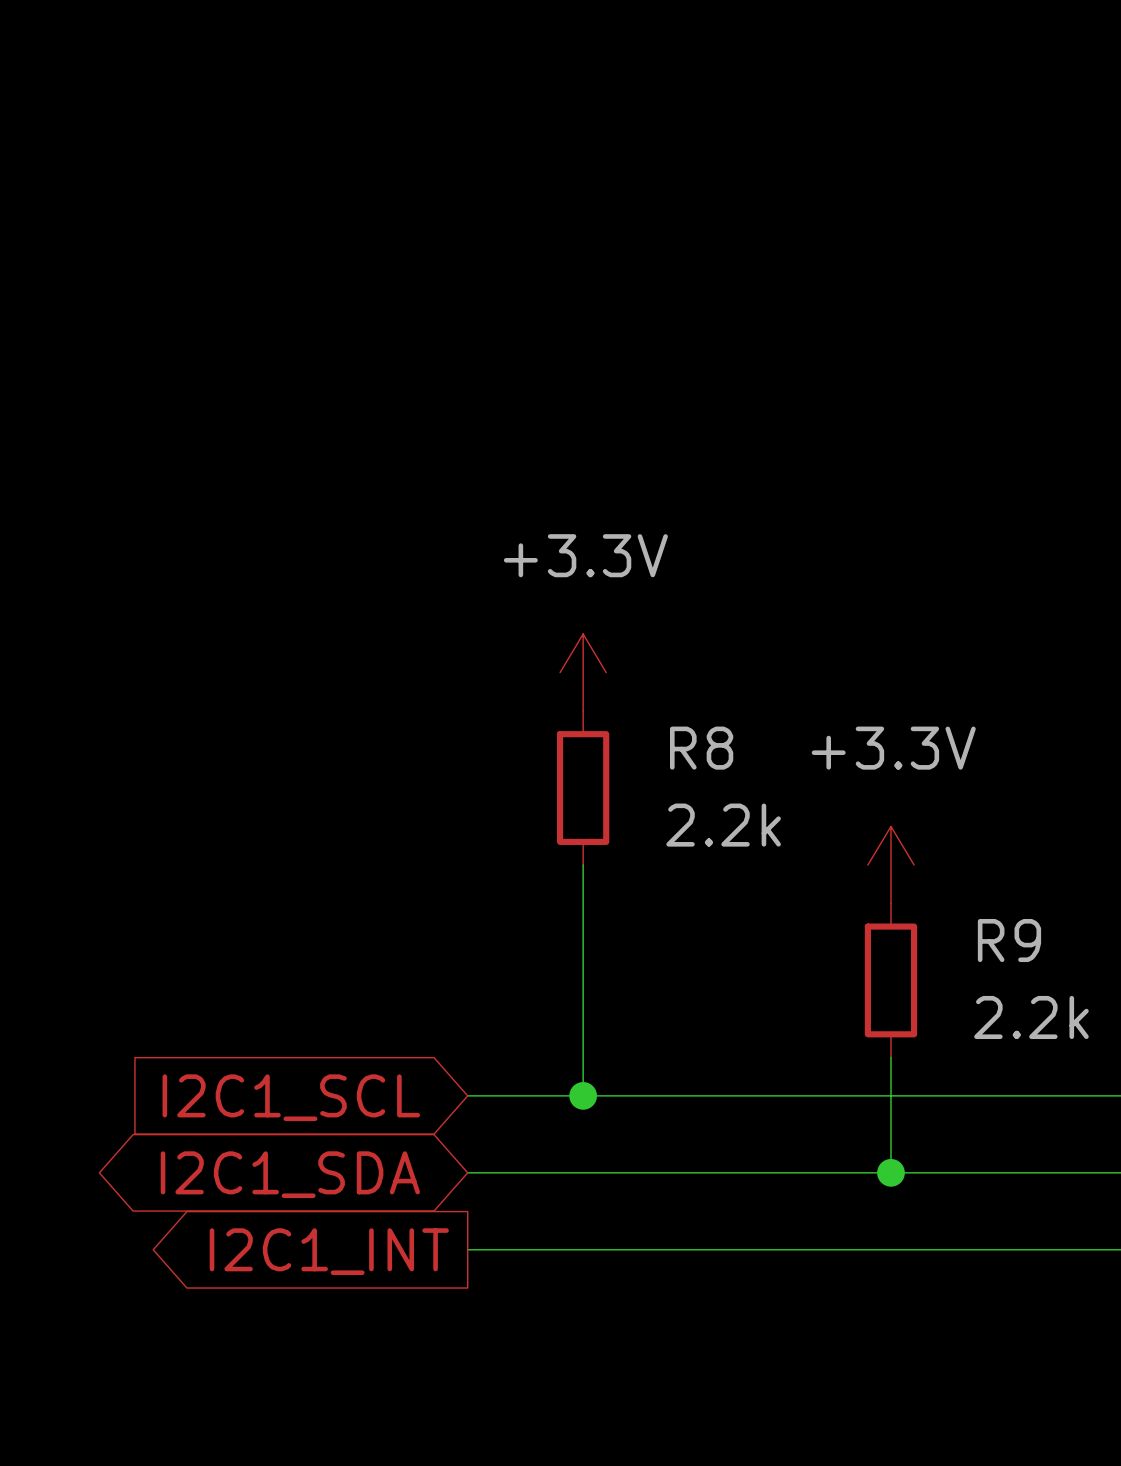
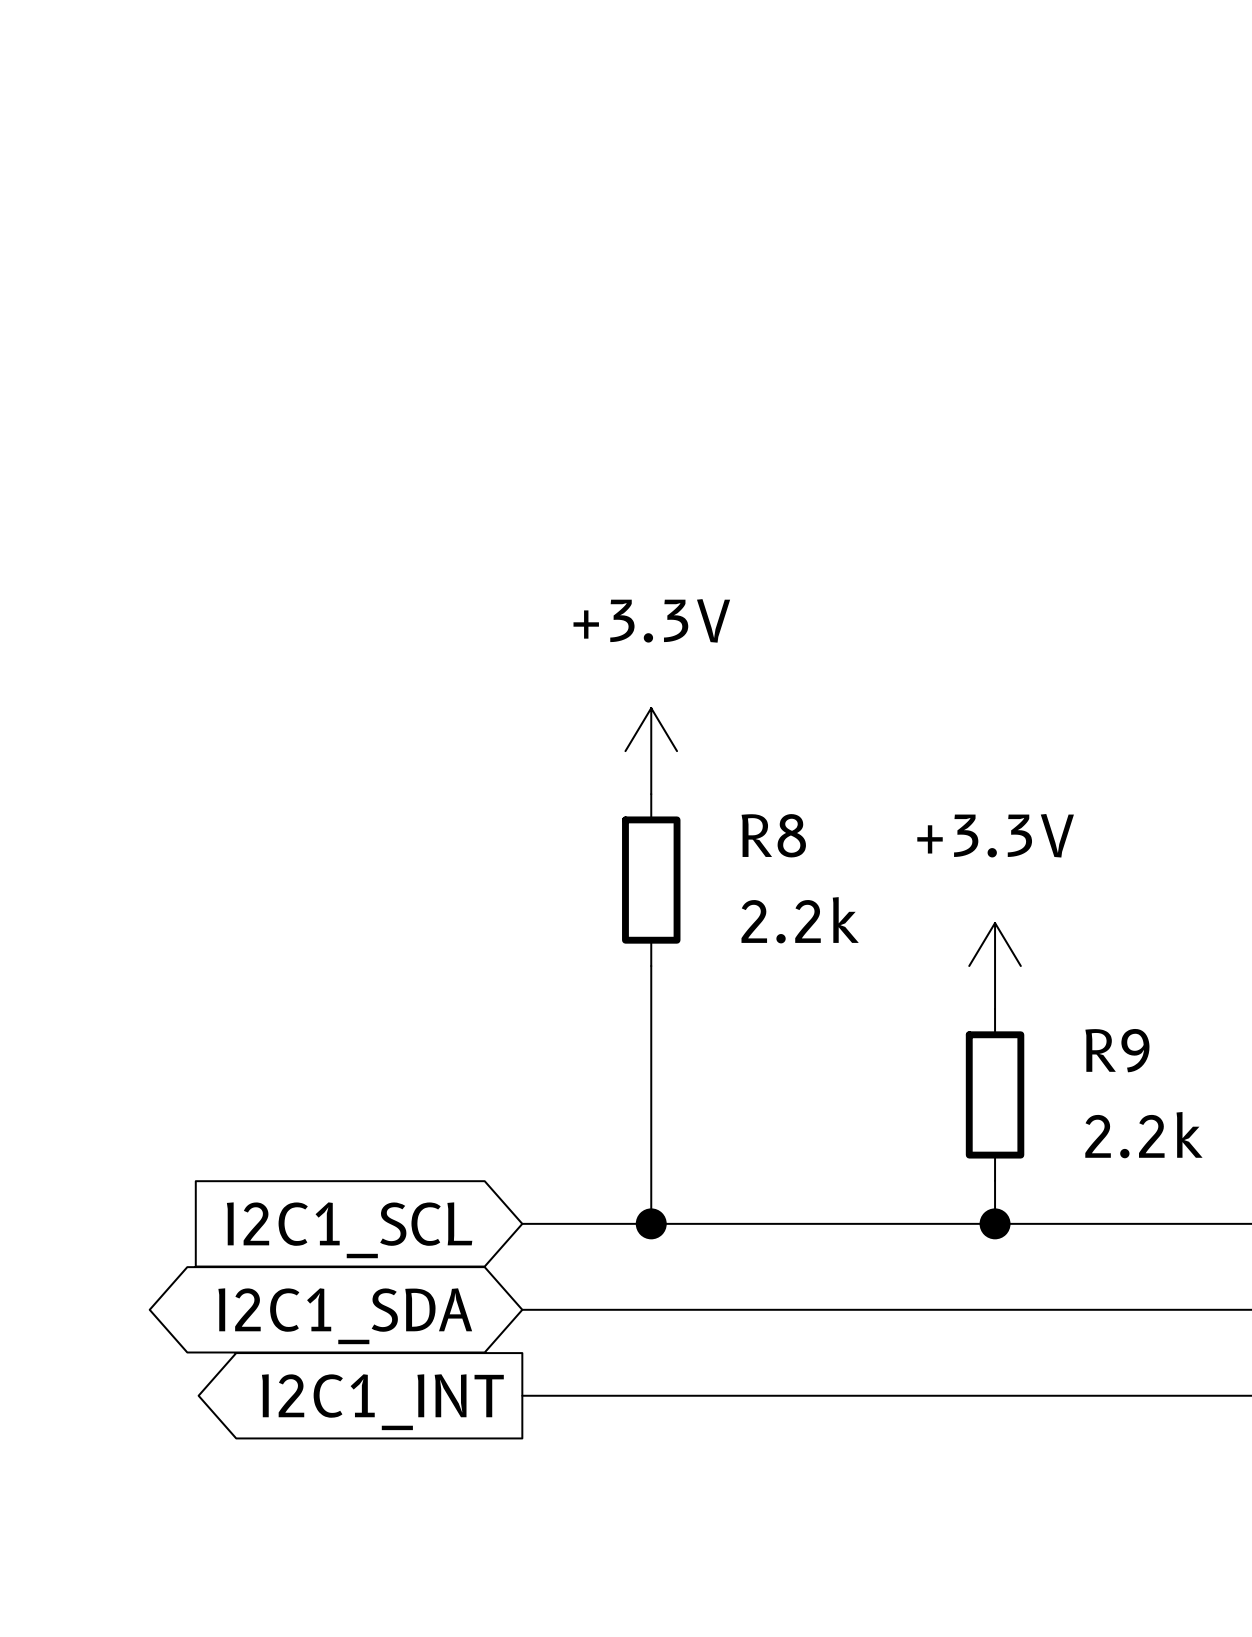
wire: (890, 1095) (890, 1172) -> none
junction position: (890, 1172) -> (995, 1223)

